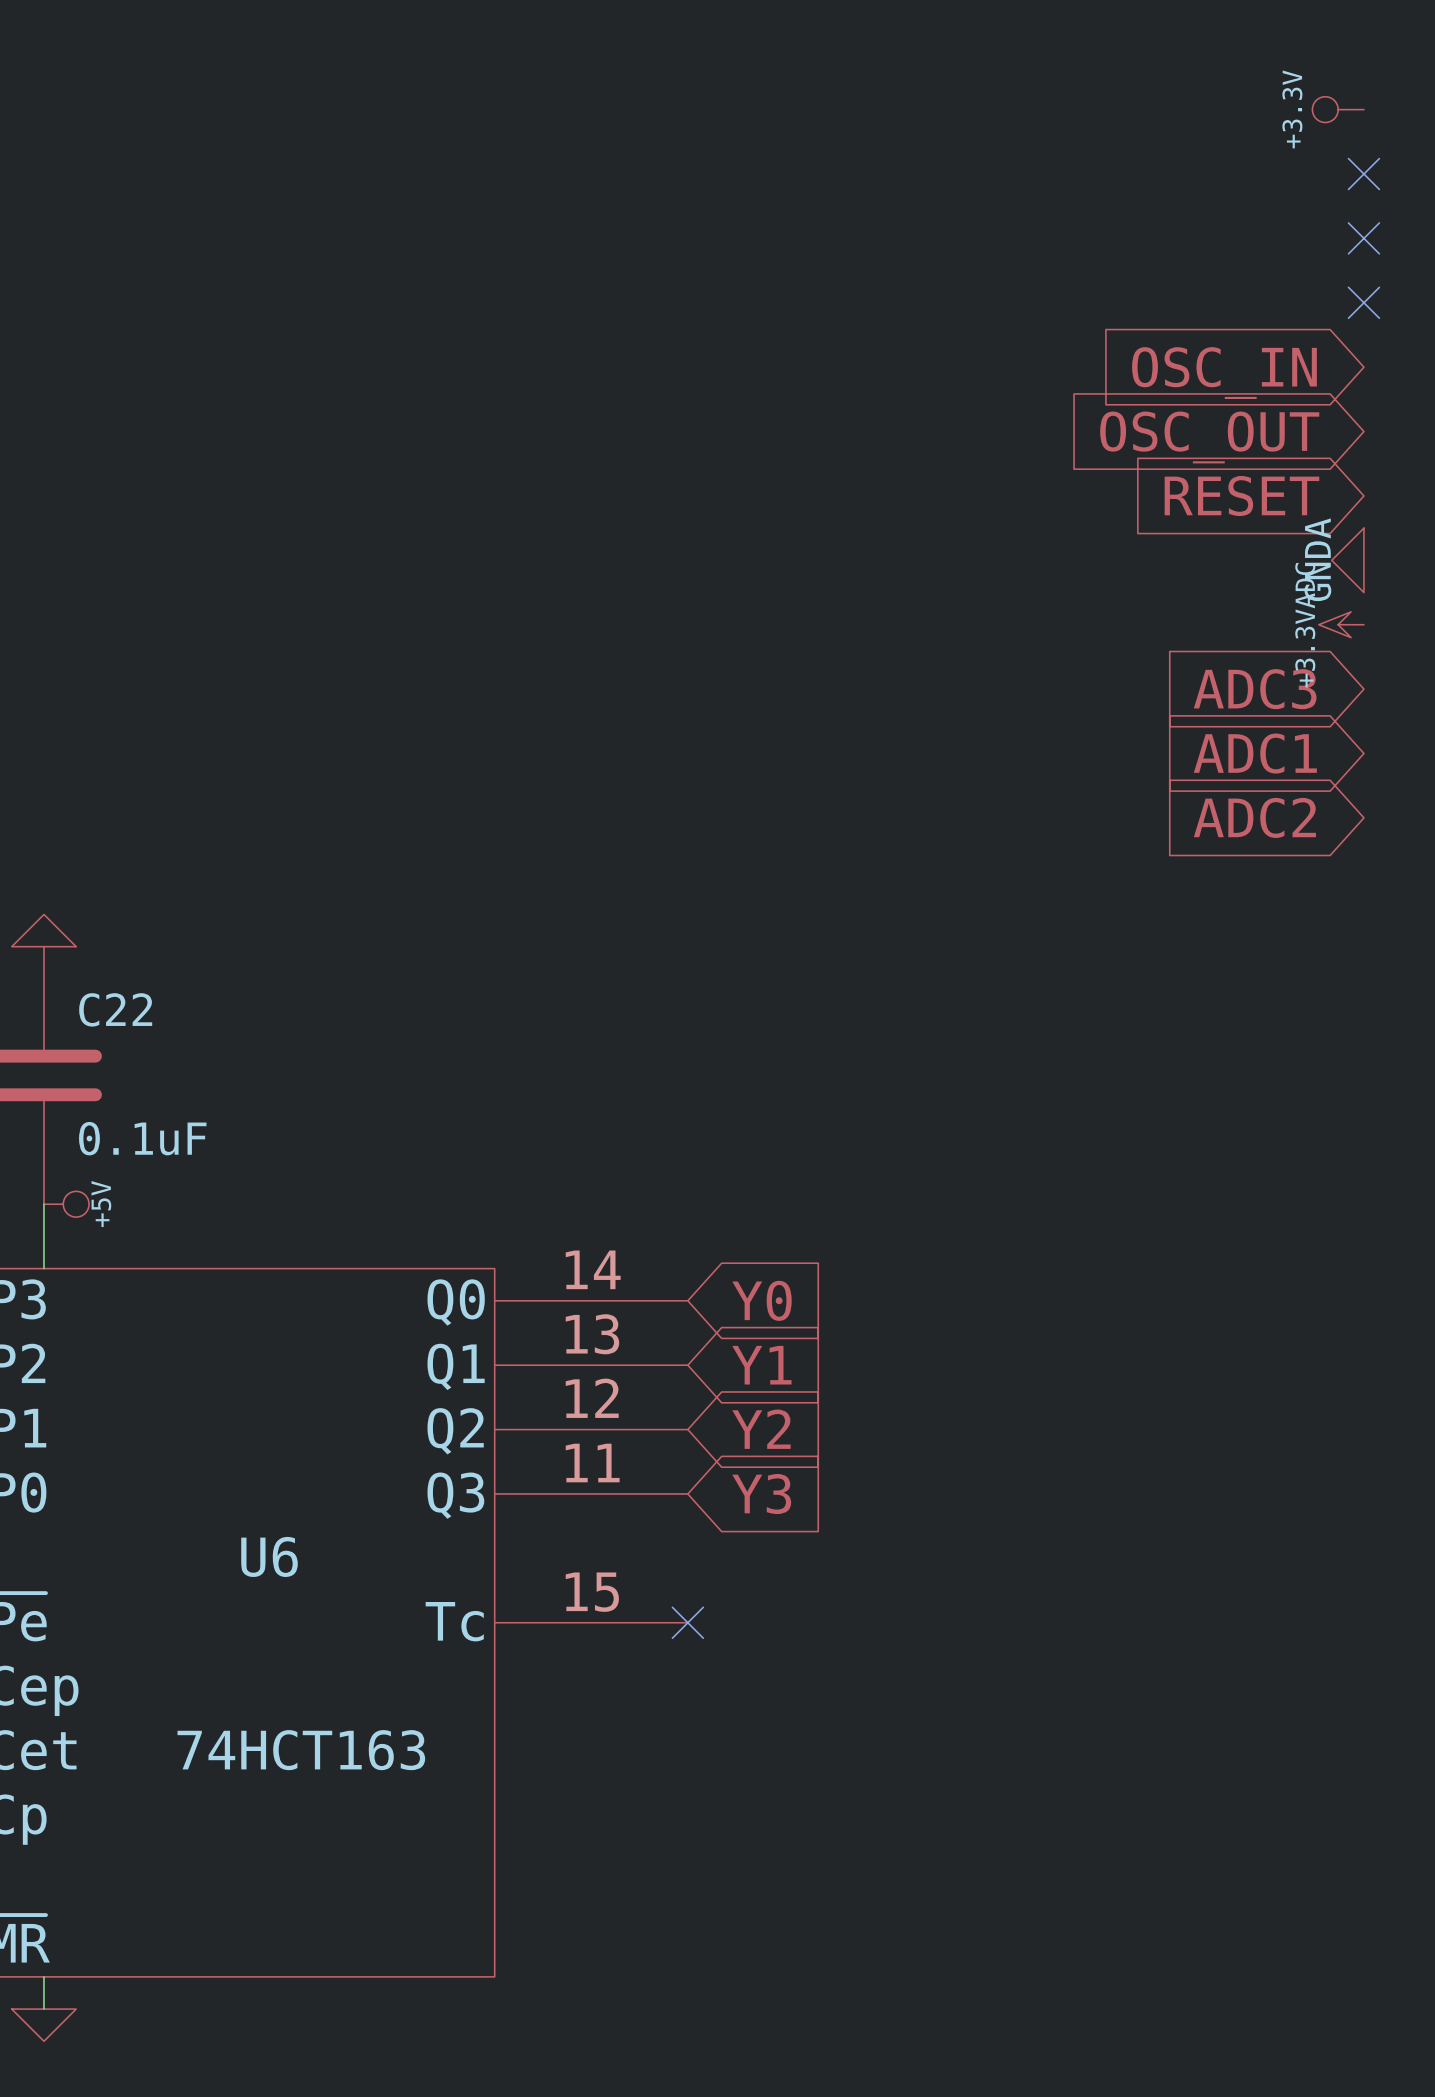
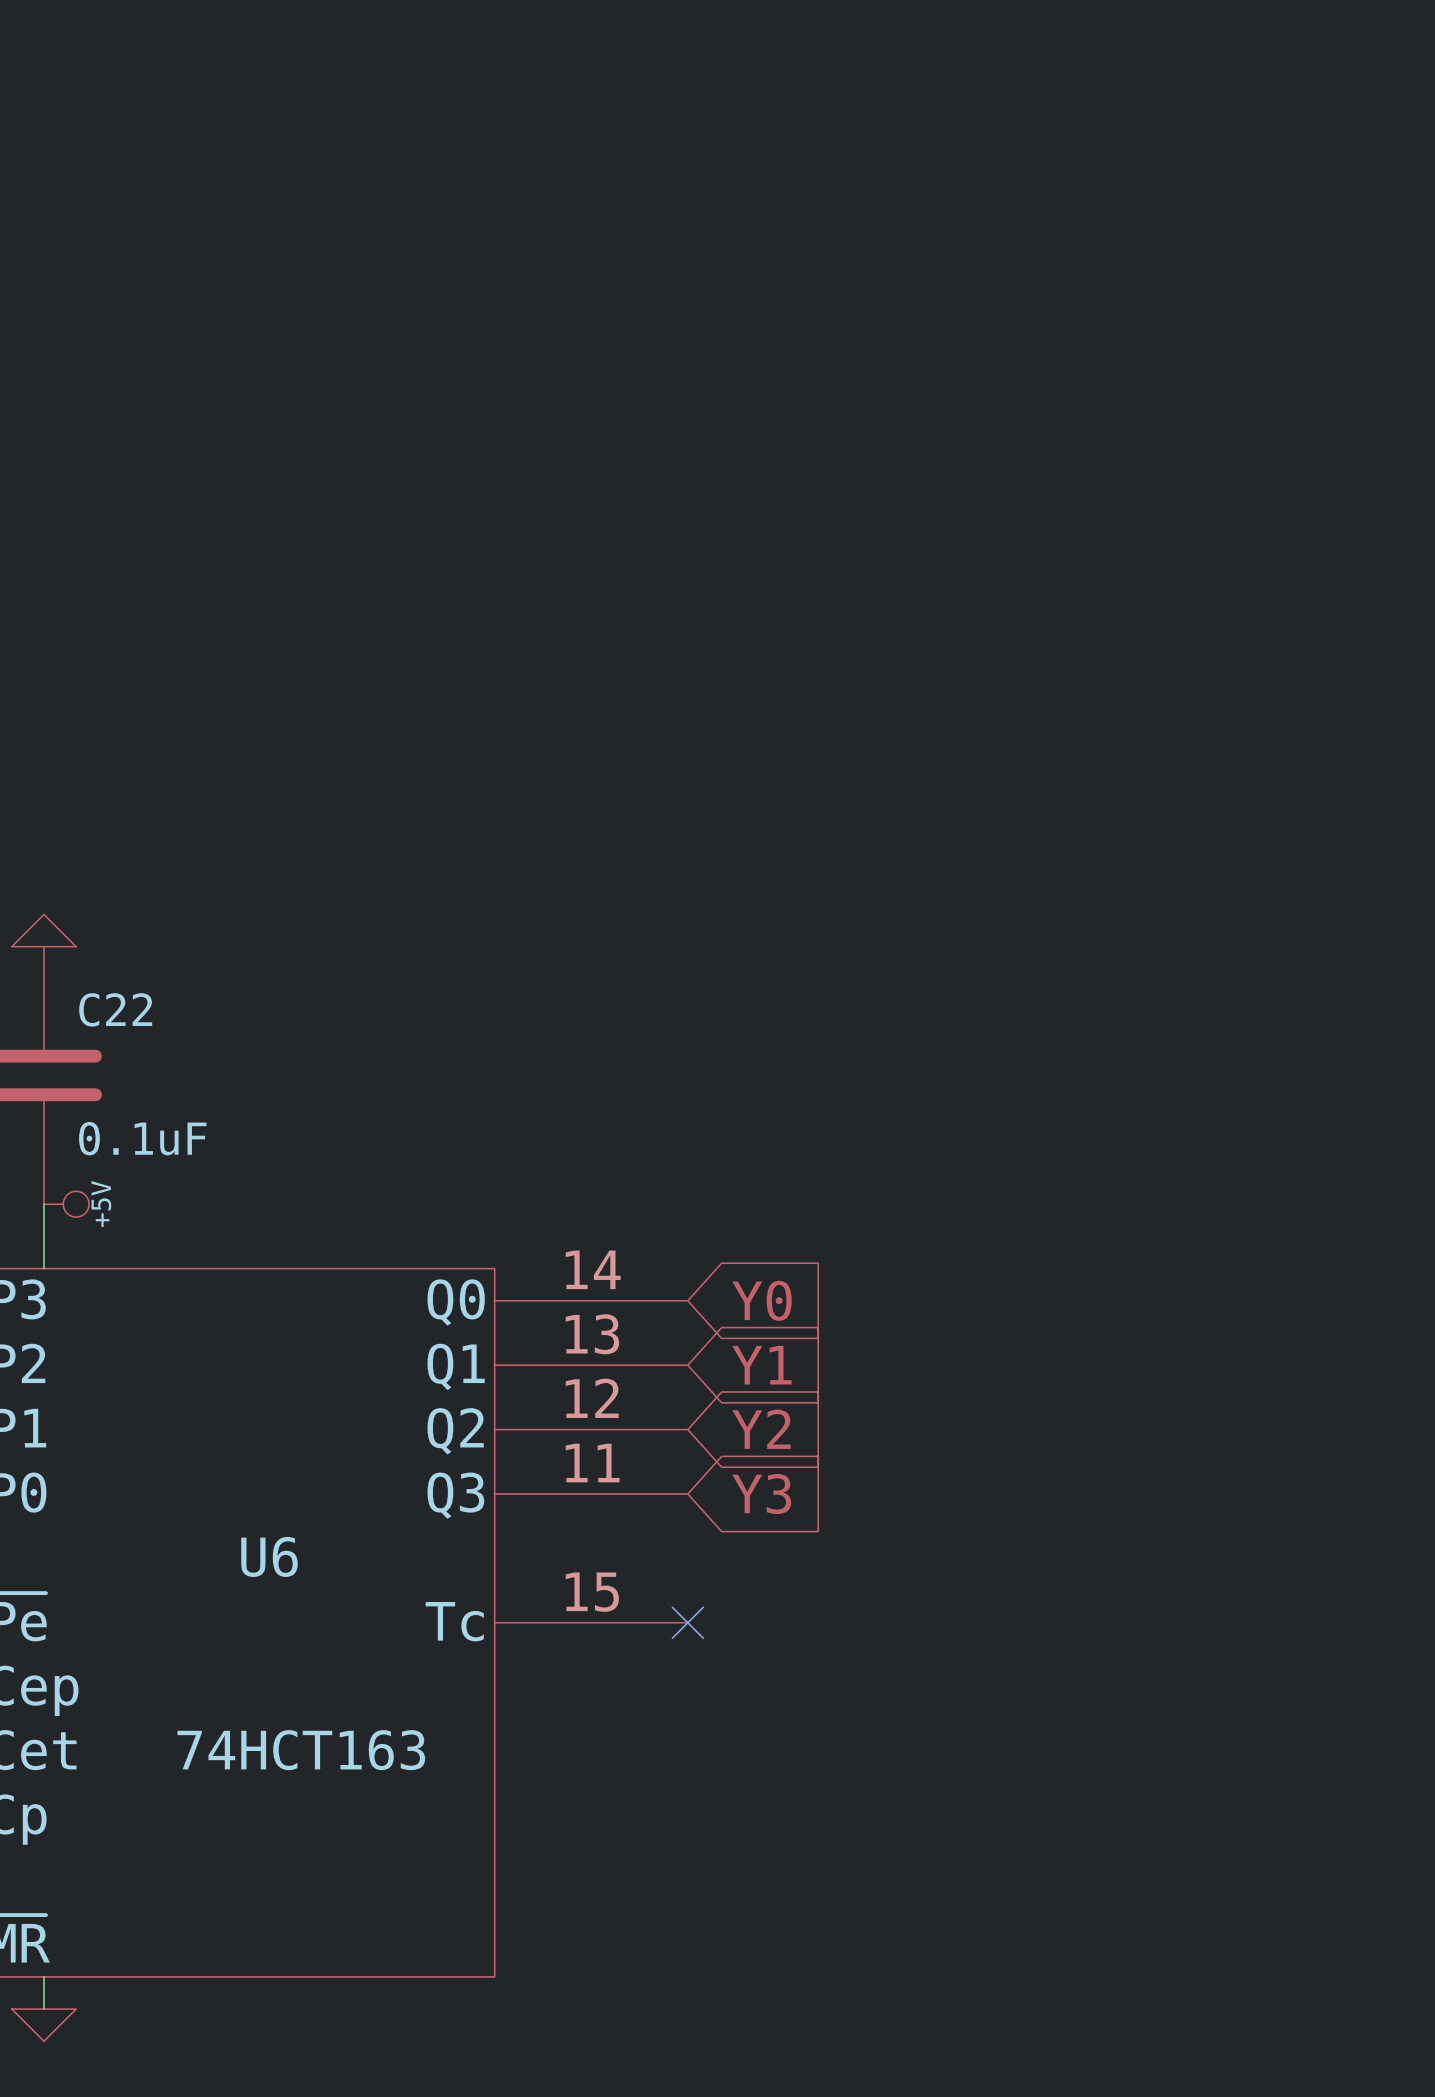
power symbol: +3.3V (1338, 109) -> none
no-connect mark: (1363, 174) -> none
no-connect mark: (1363, 238) -> none
no-connect mark: (1363, 302) -> none
global label: OSC_IN (1224, 373) -> none
global label: OSC_OUT (1209, 437) -> none
global label: RESET (1241, 495) -> none
power symbol: GNDA (1347, 560) -> none
power symbol: +3.3VADC (1341, 624) -> none
global label: ADC3 (1255, 689) -> none
global label: ADC1 (1255, 753) -> none
global label: ADC2 (1254, 817) -> none

